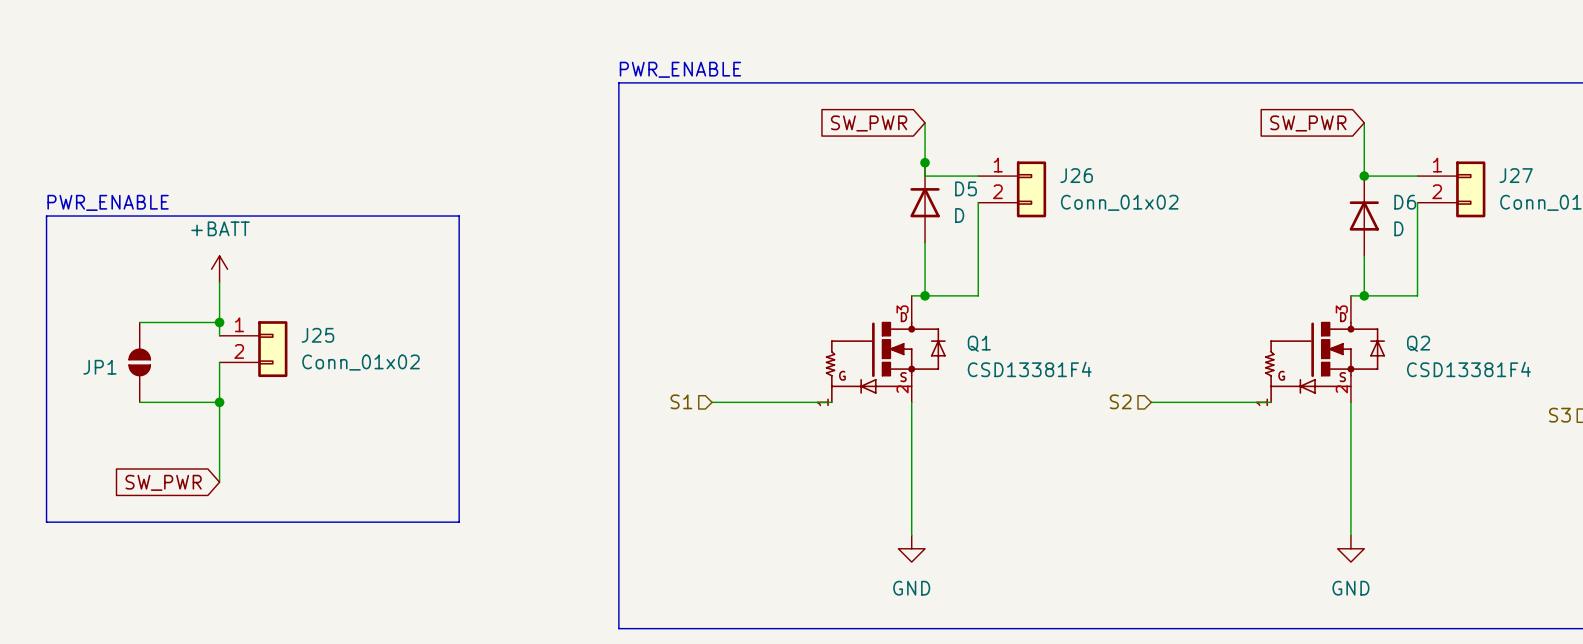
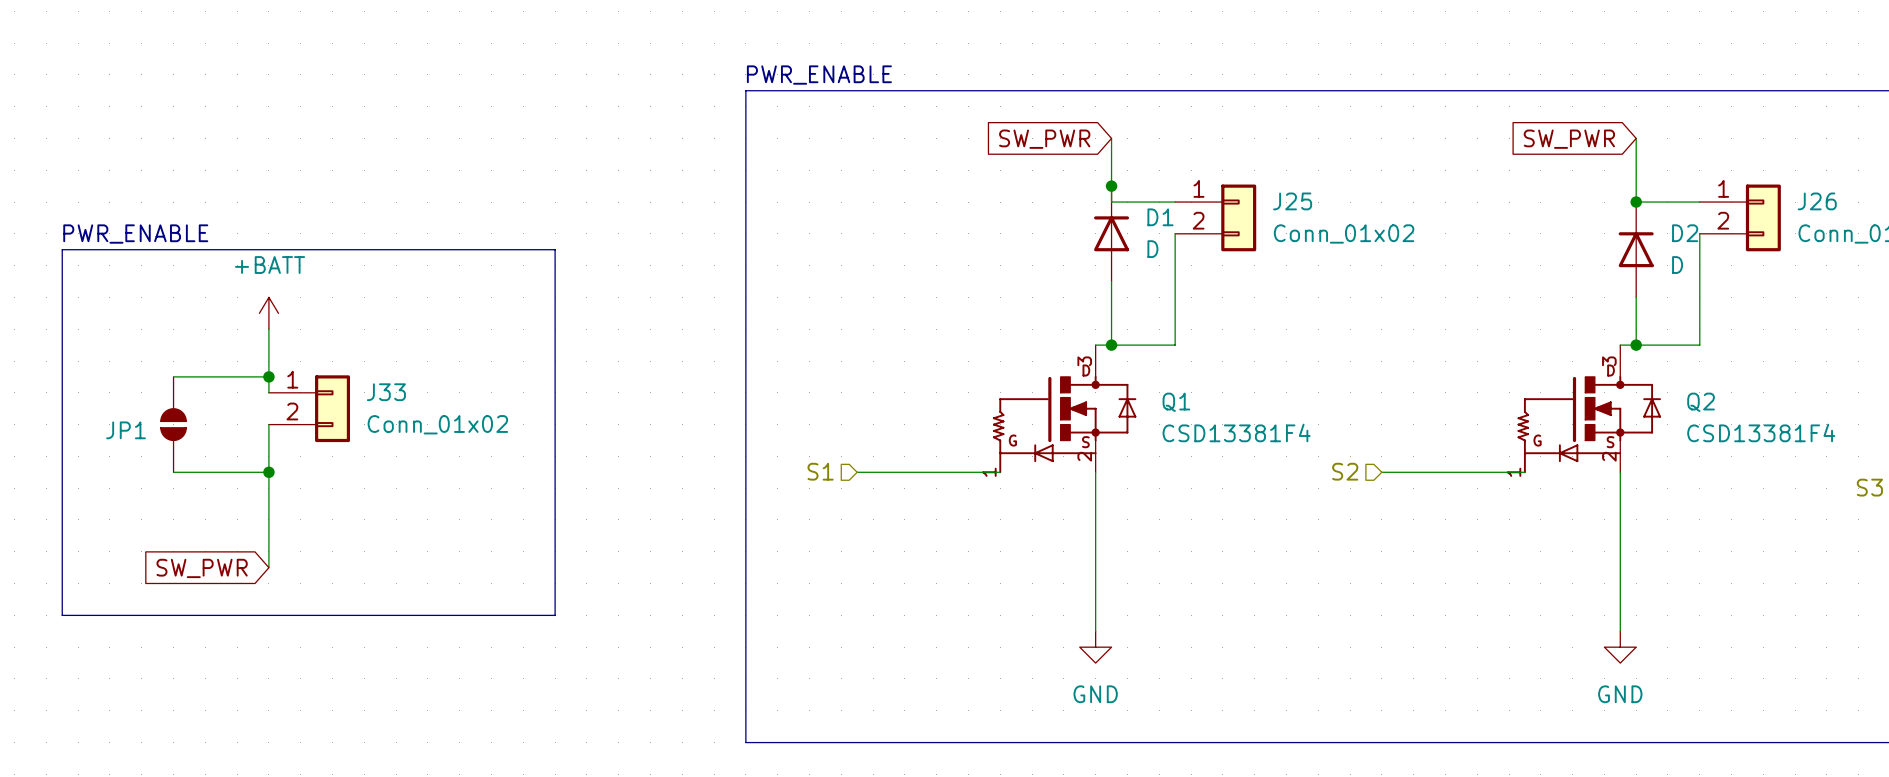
J26 name: J26 (1076, 175) -> J25 (1292, 201)
J27 name: J27 (1516, 175) -> J26 (1817, 201)
D5 name: D5 (966, 188) -> D1 (1160, 217)
D6 name: D6 (1405, 202) -> D2 (1685, 233)
J25 name: J25 (317, 335) -> J33 (386, 392)

